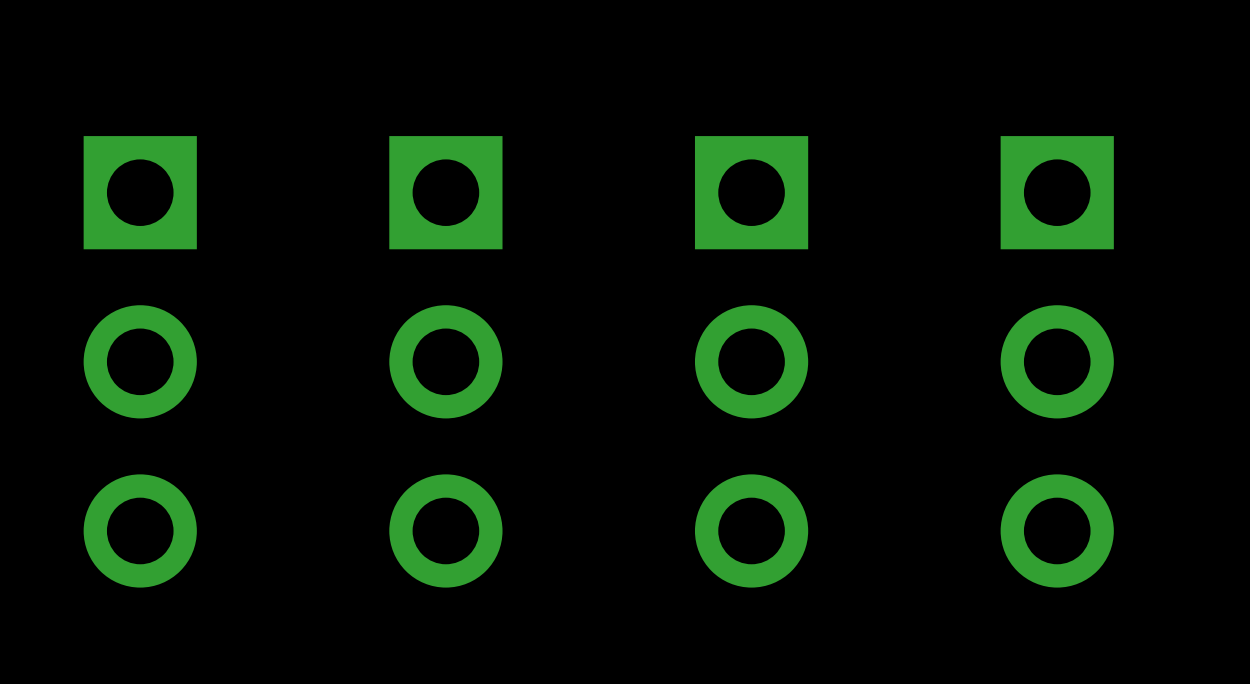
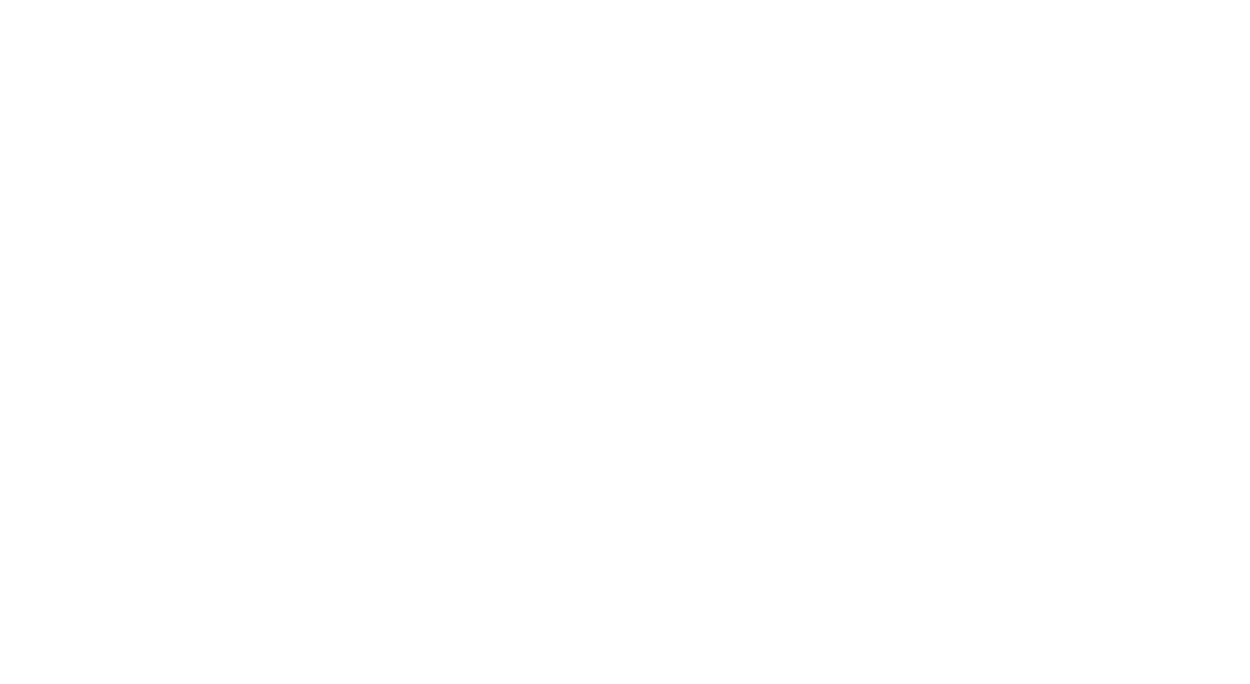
part: (140, 361) -> none
part: (445, 361) -> none
part: (751, 361) -> none
part: (1057, 361) -> none

